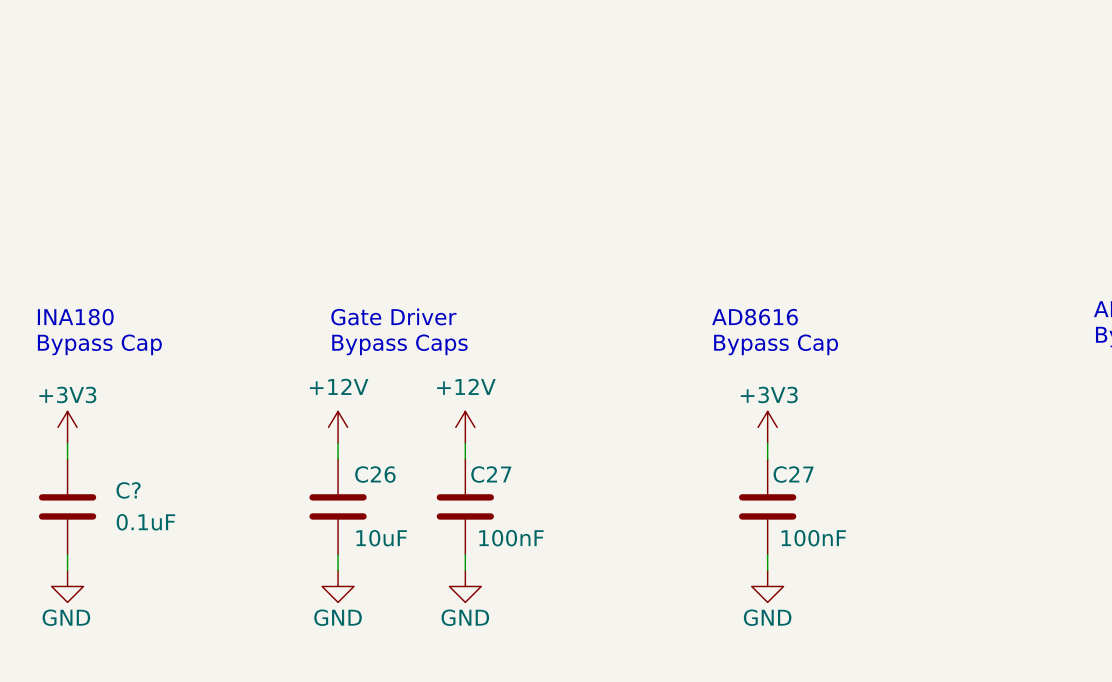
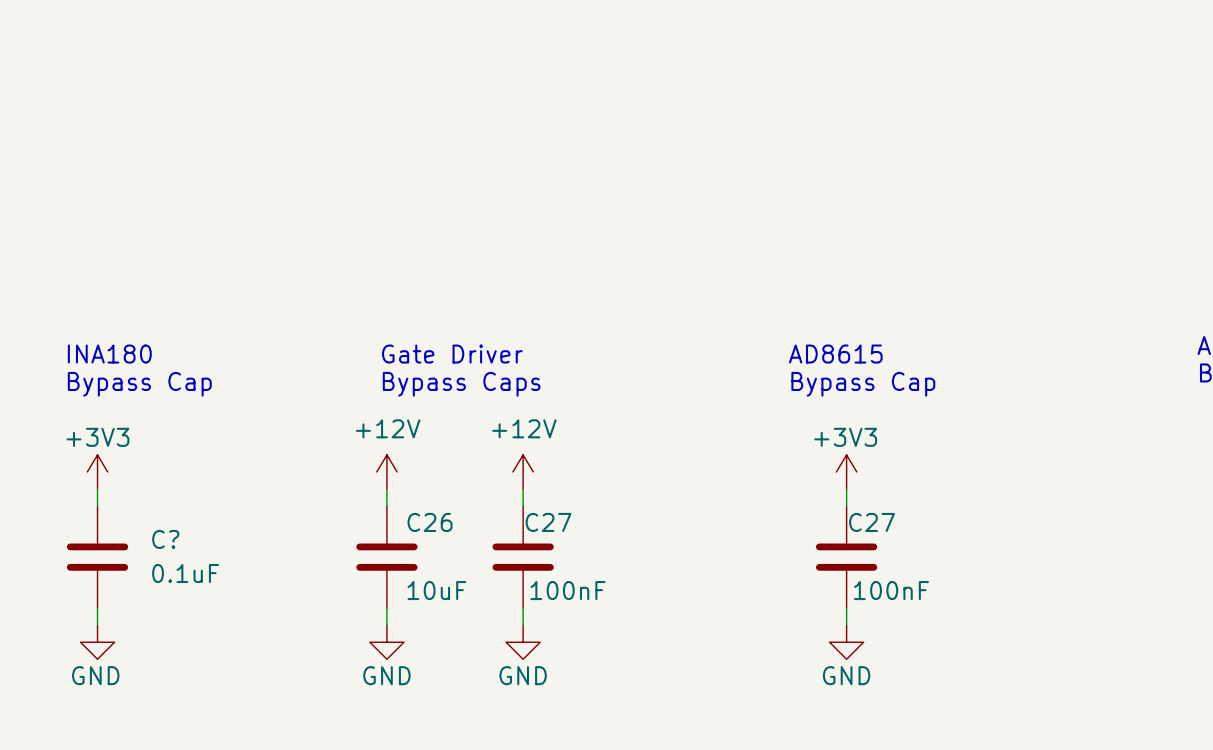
text: AD8616 (754, 317) -> AD8615 (835, 354)

